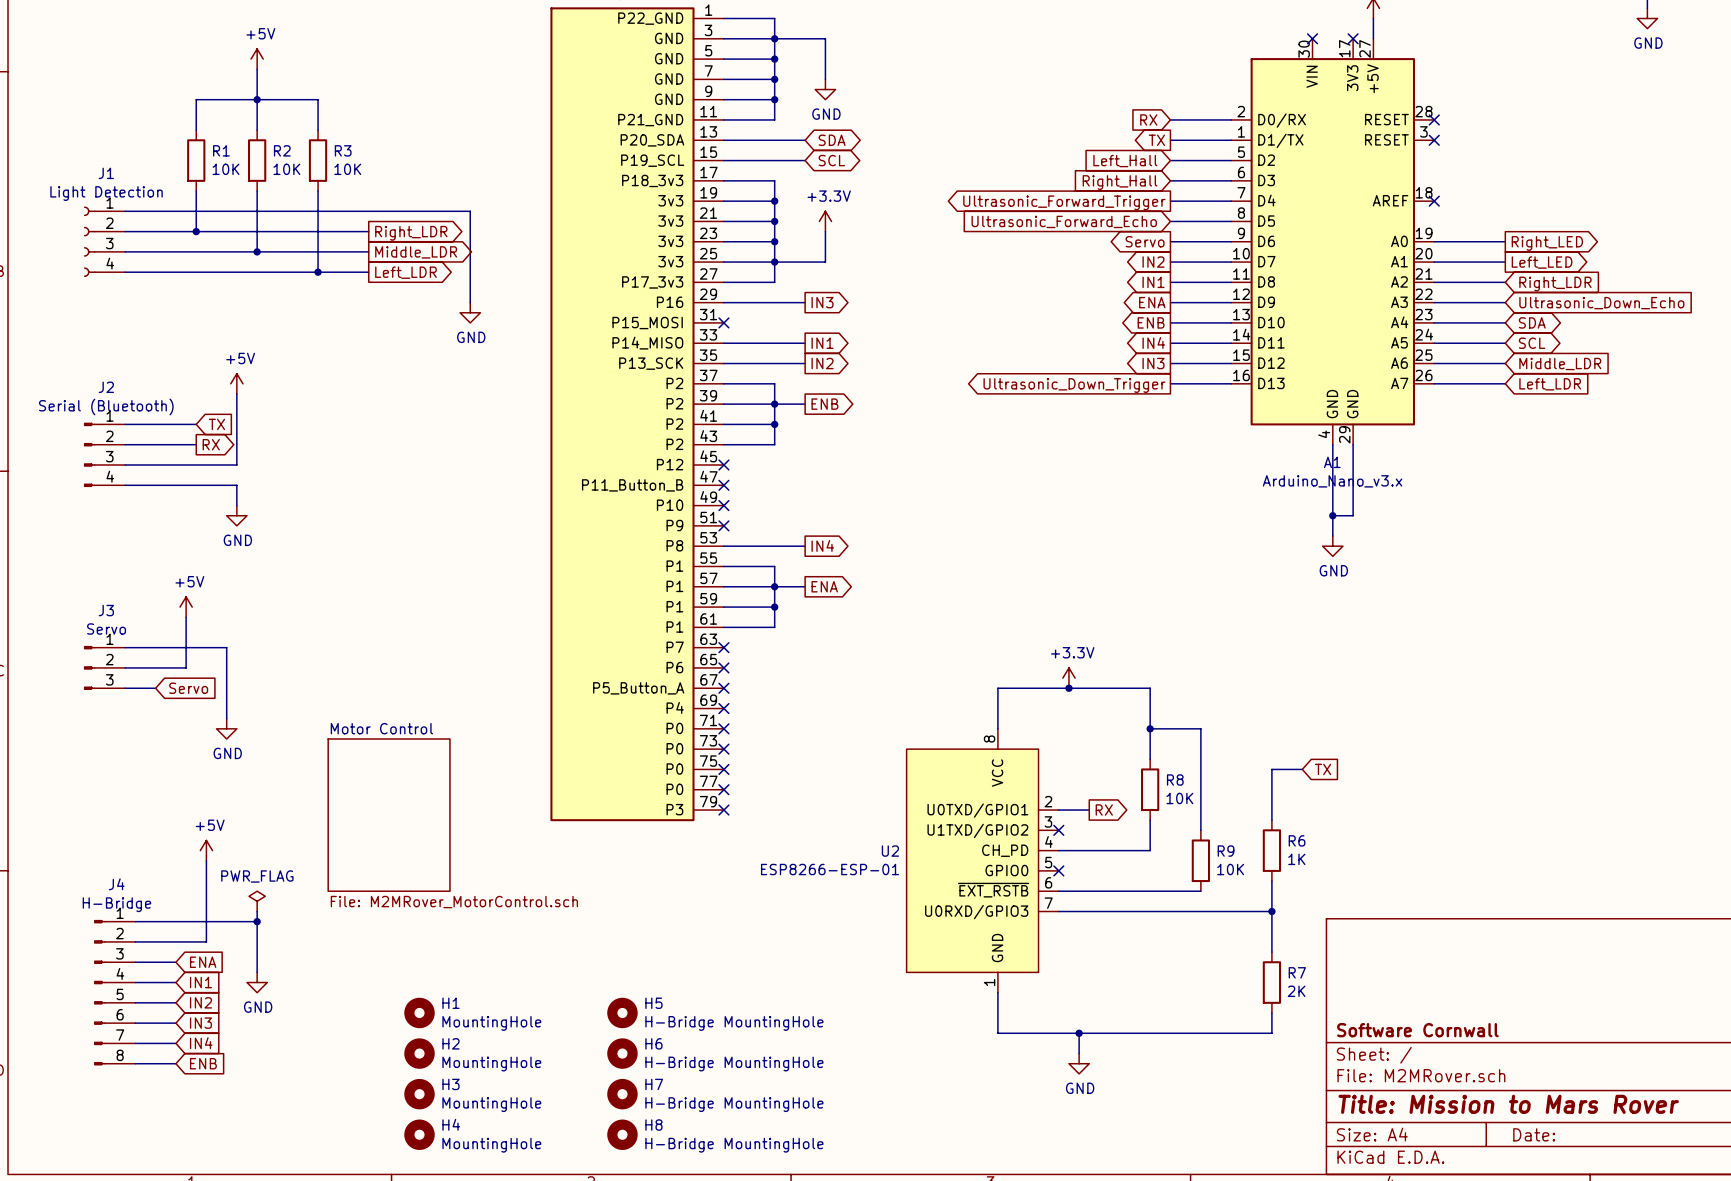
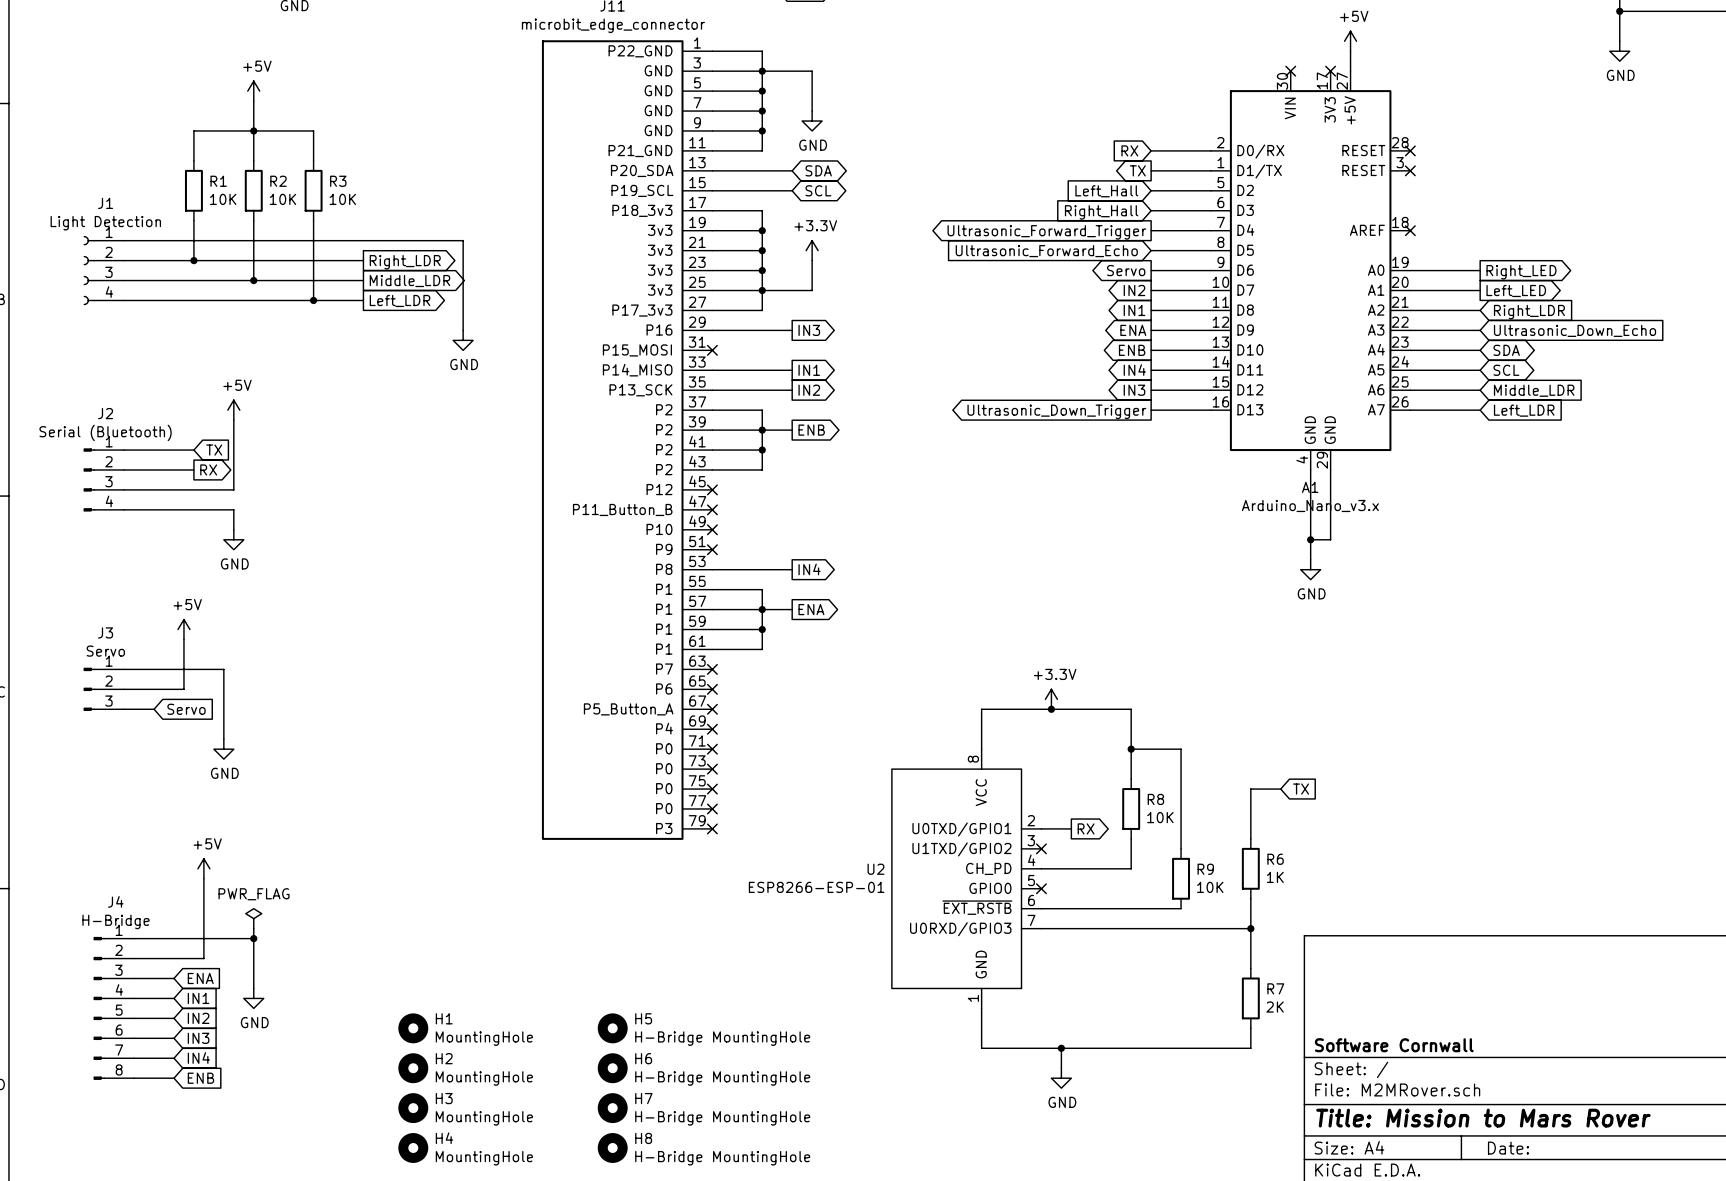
sheet Motor Control: File: M2MRover_MotorControl.sch (389, 815) -> none

